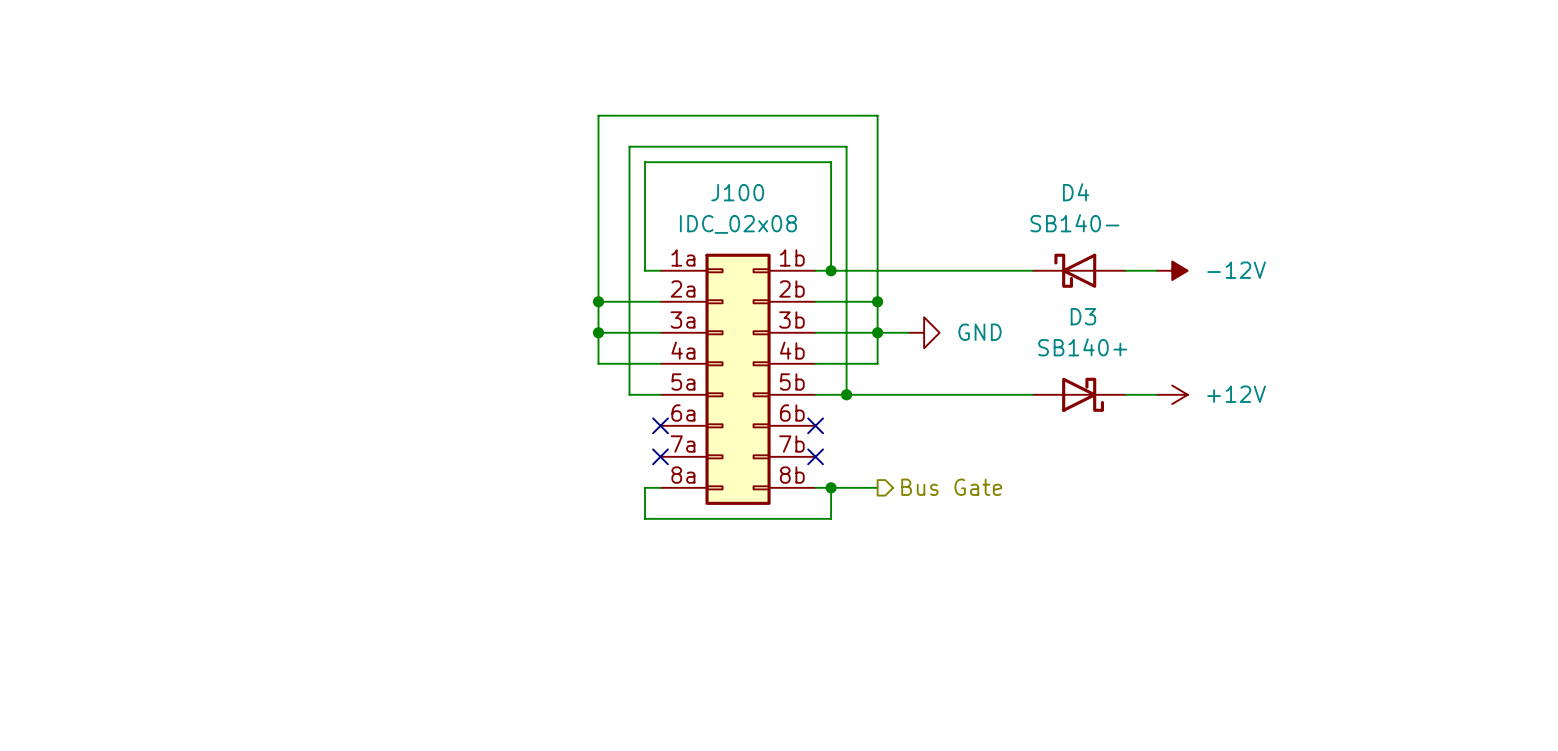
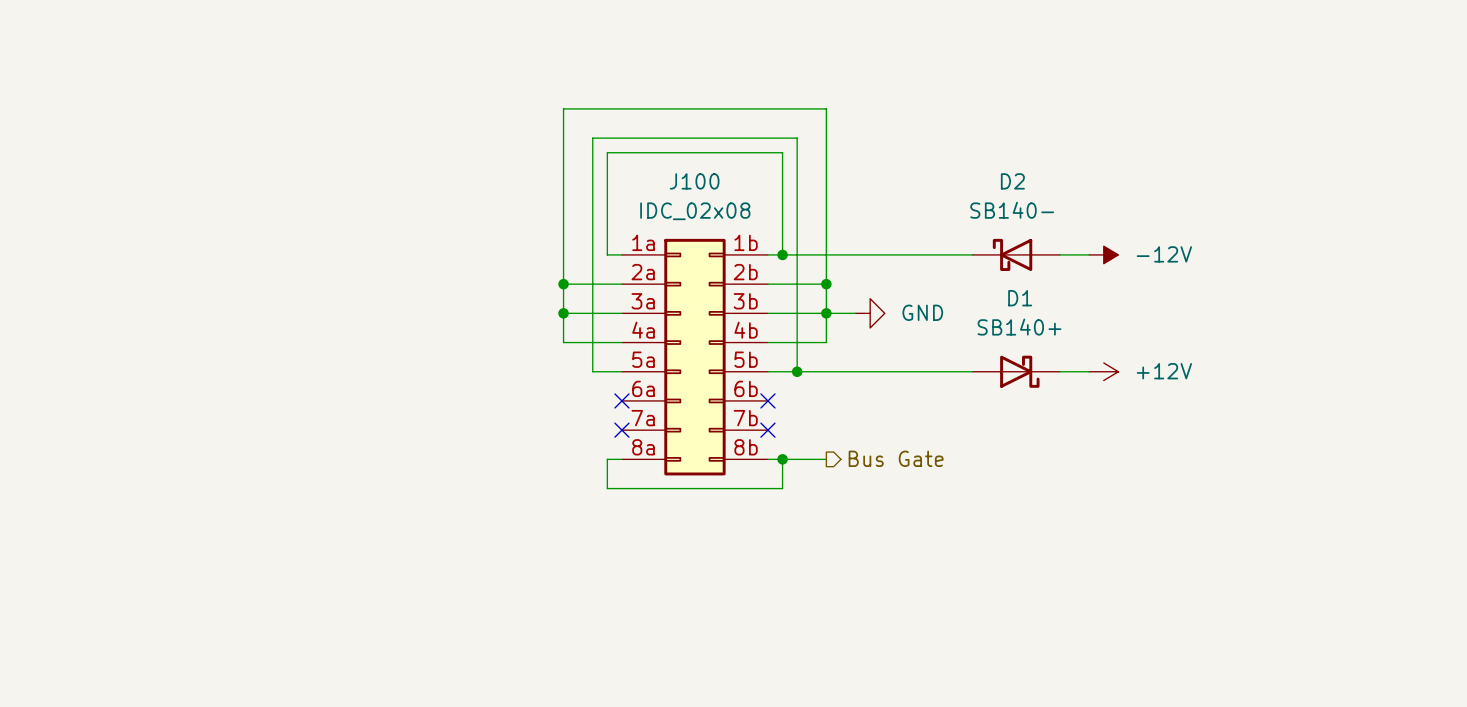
D4 name: D4 (1076, 192) -> D2 (1012, 181)
D3 name: D3 (1083, 316) -> D1 (1020, 298)

